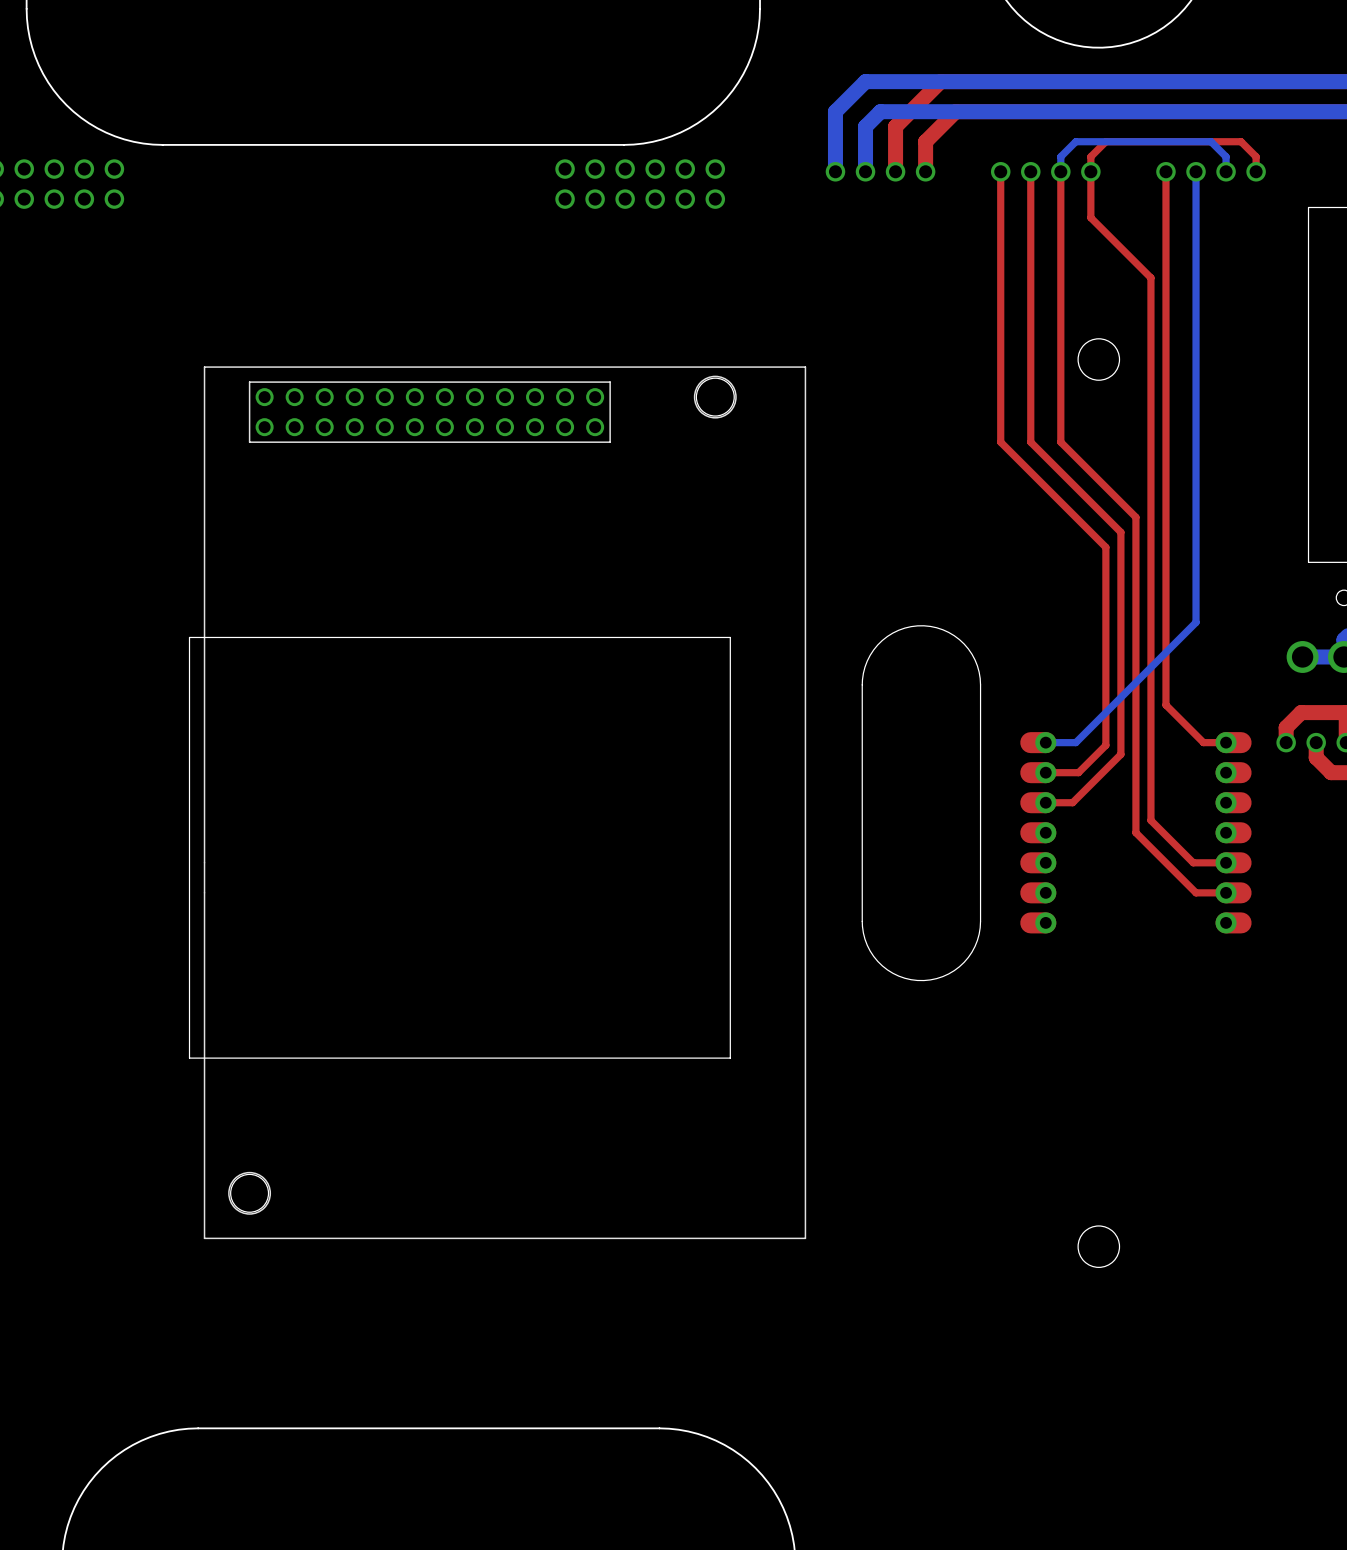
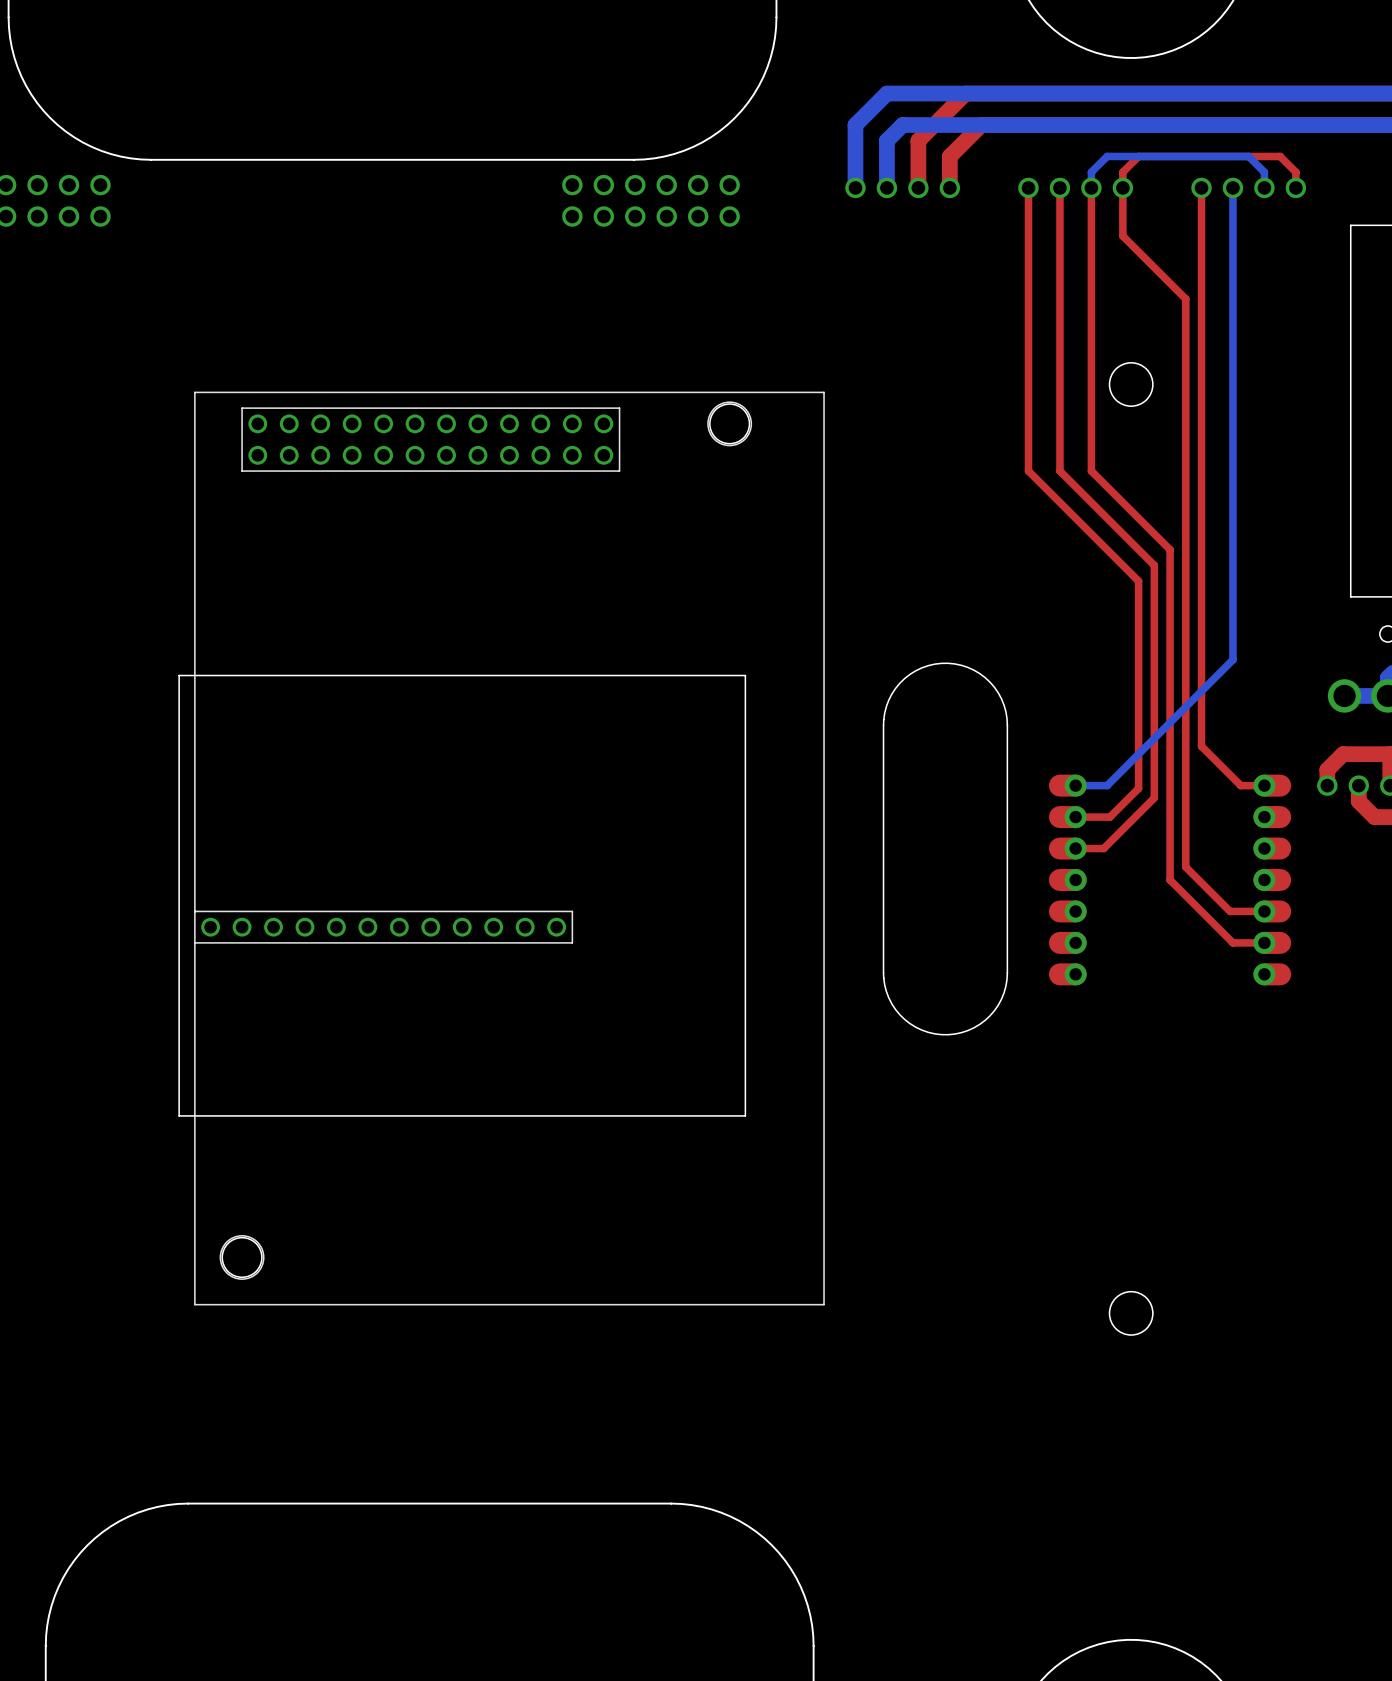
part footprint: [189, 366, 807, 1240] -> [179, 391, 825, 1306]

